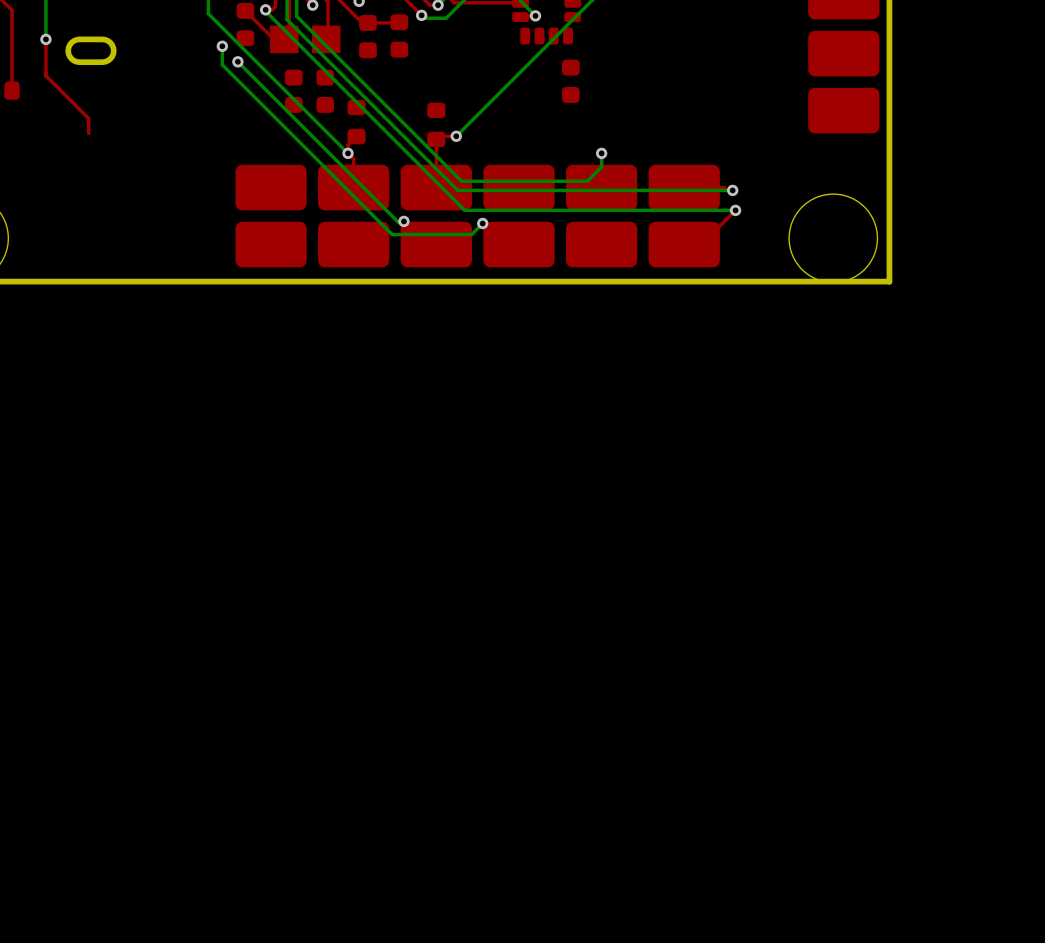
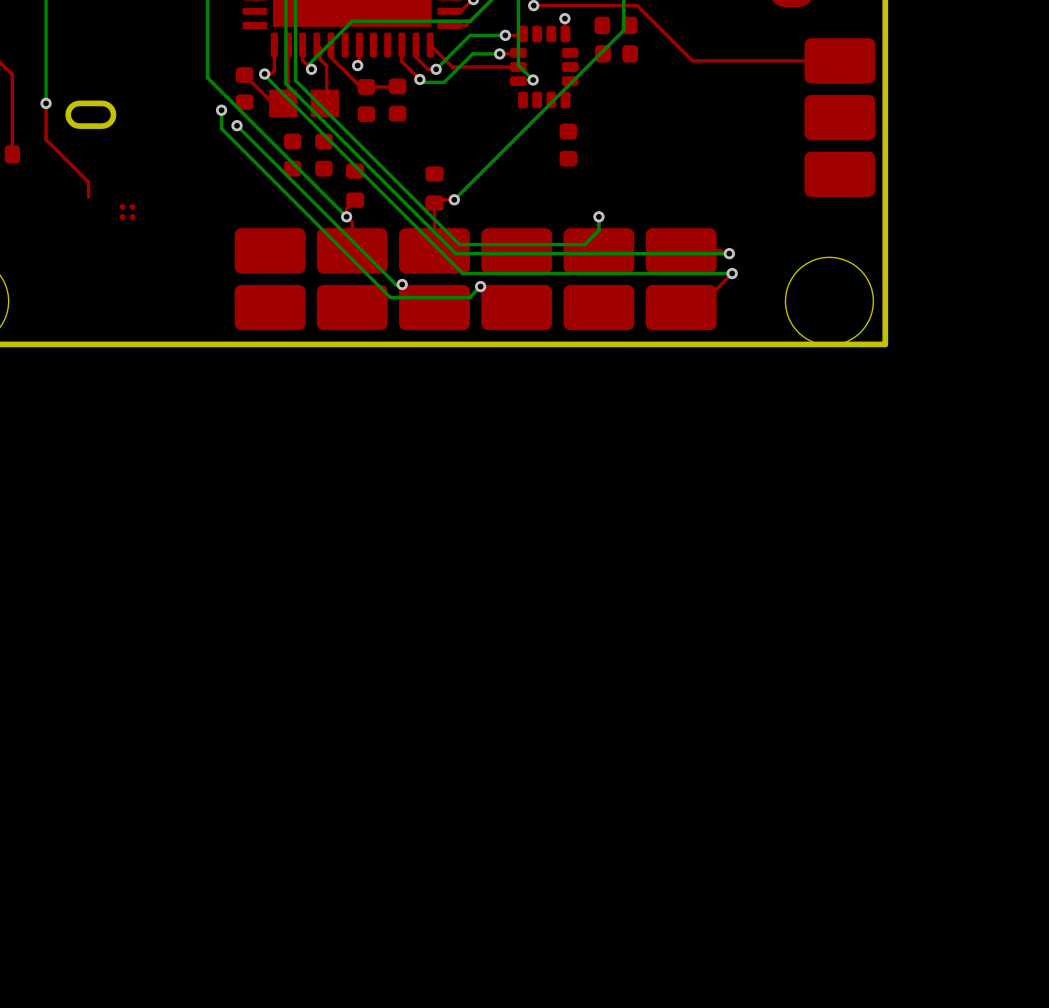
part: none -> (127, 211)

